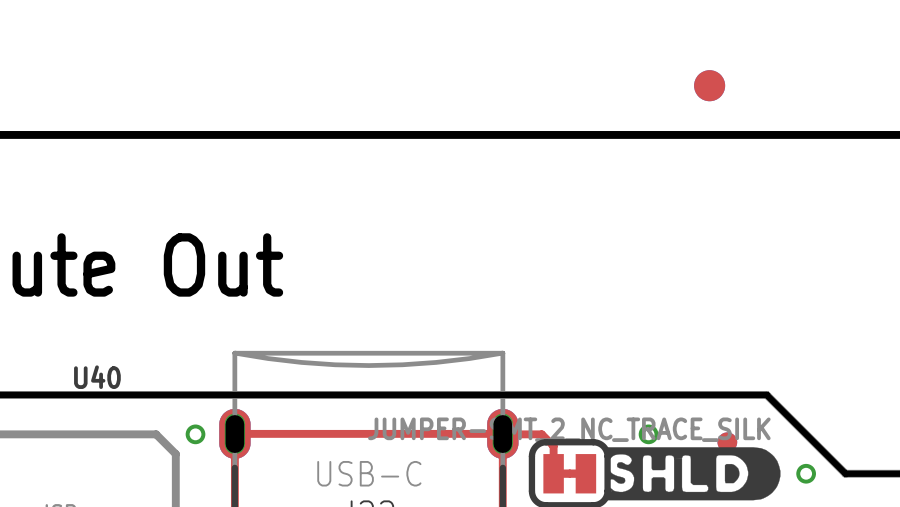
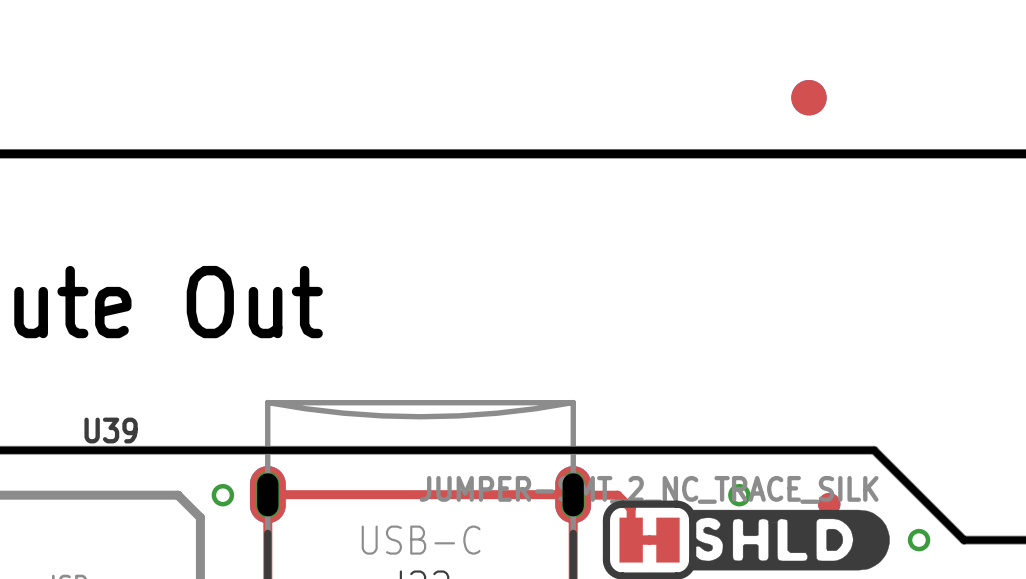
U40 name: U40 (97, 377) -> U39 (111, 430)

